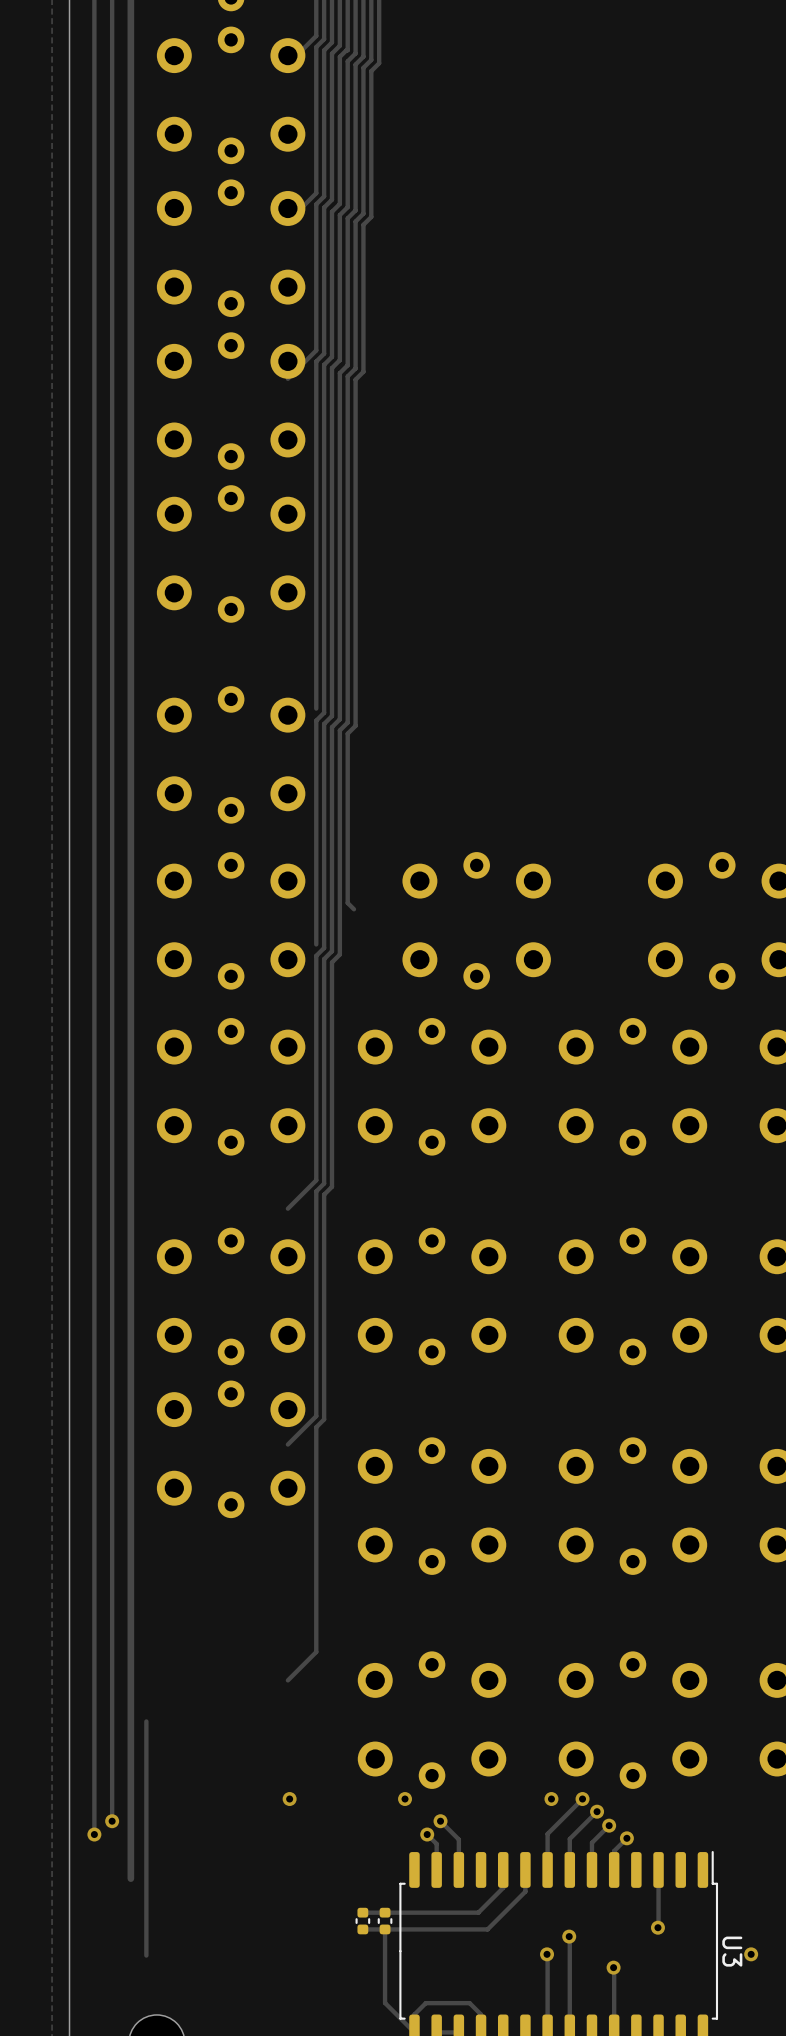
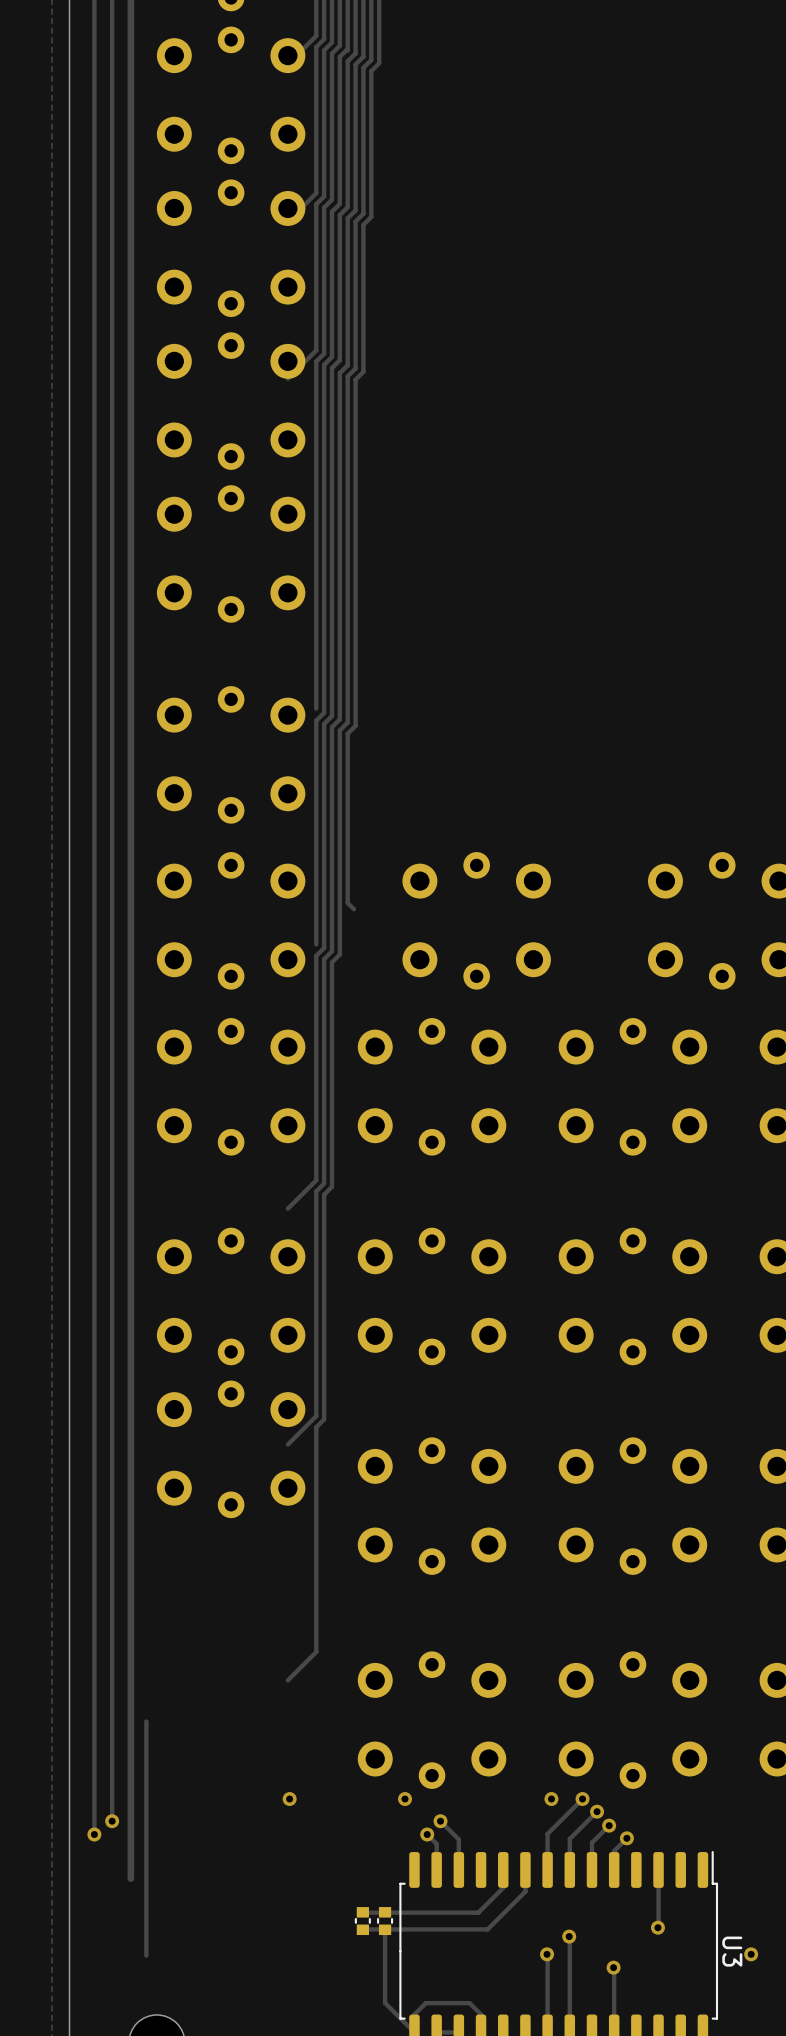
part footprint: [355, 1907, 371, 1935] -> [354, 1907, 371, 1936]
part footprint: [377, 1907, 393, 1935] -> [377, 1907, 394, 1936]

